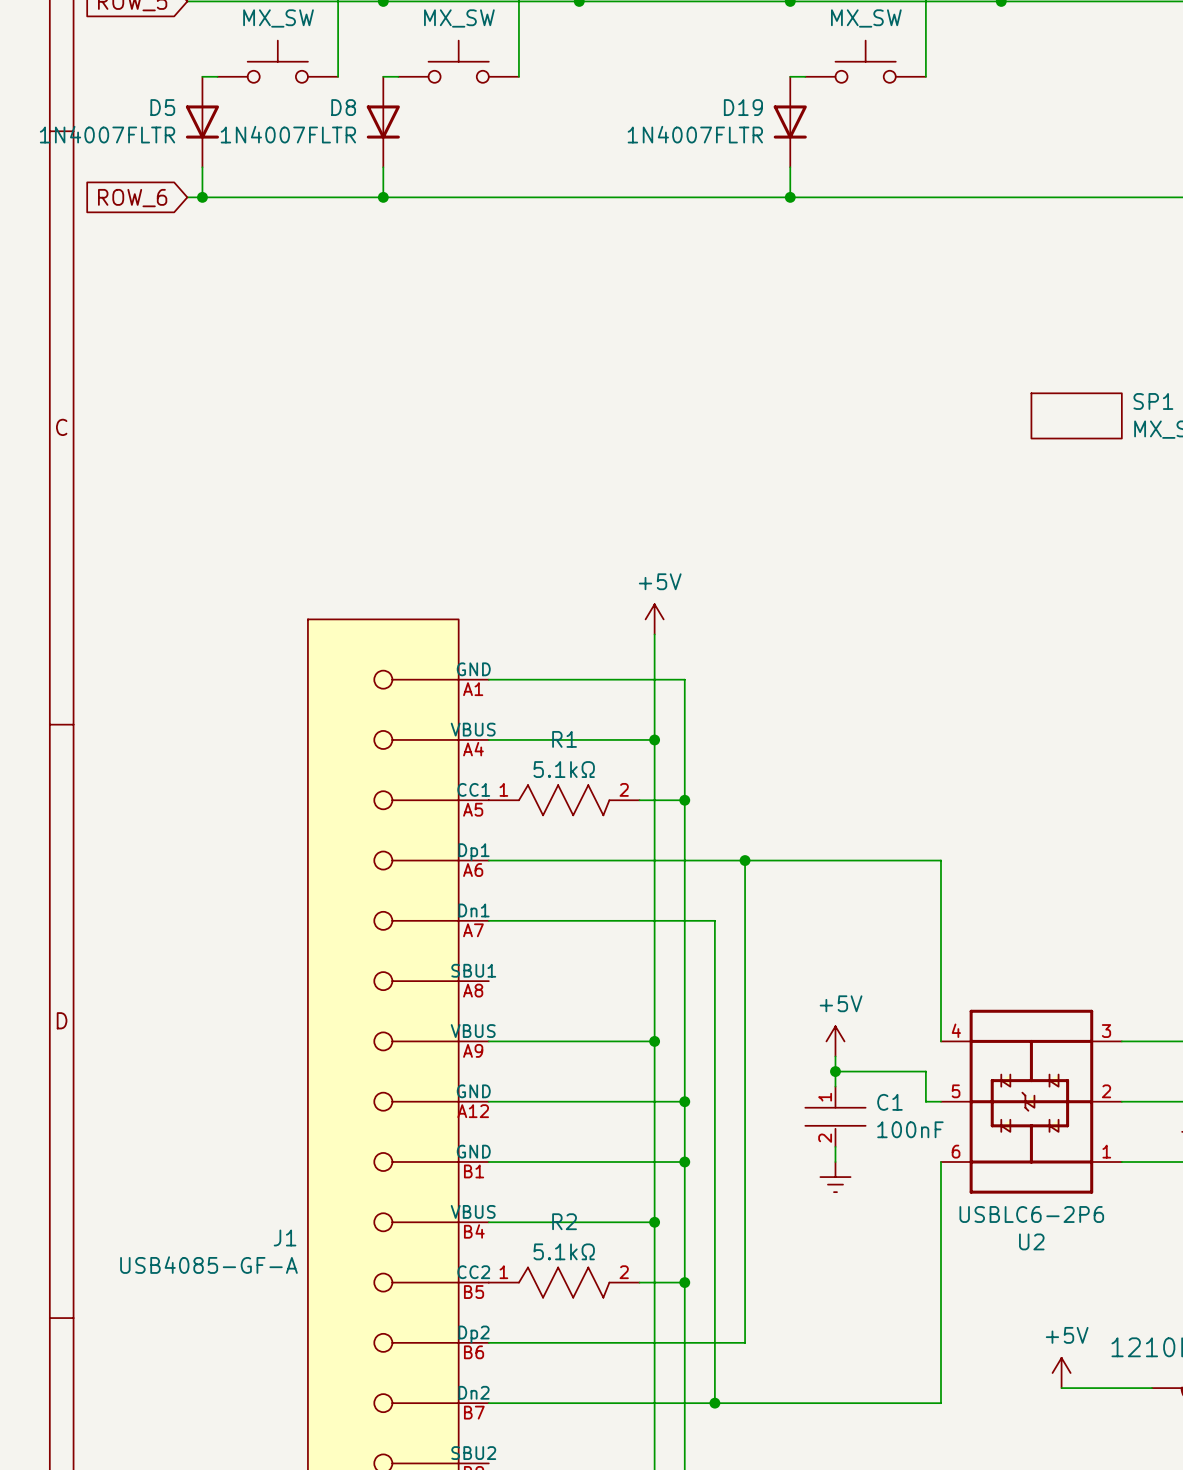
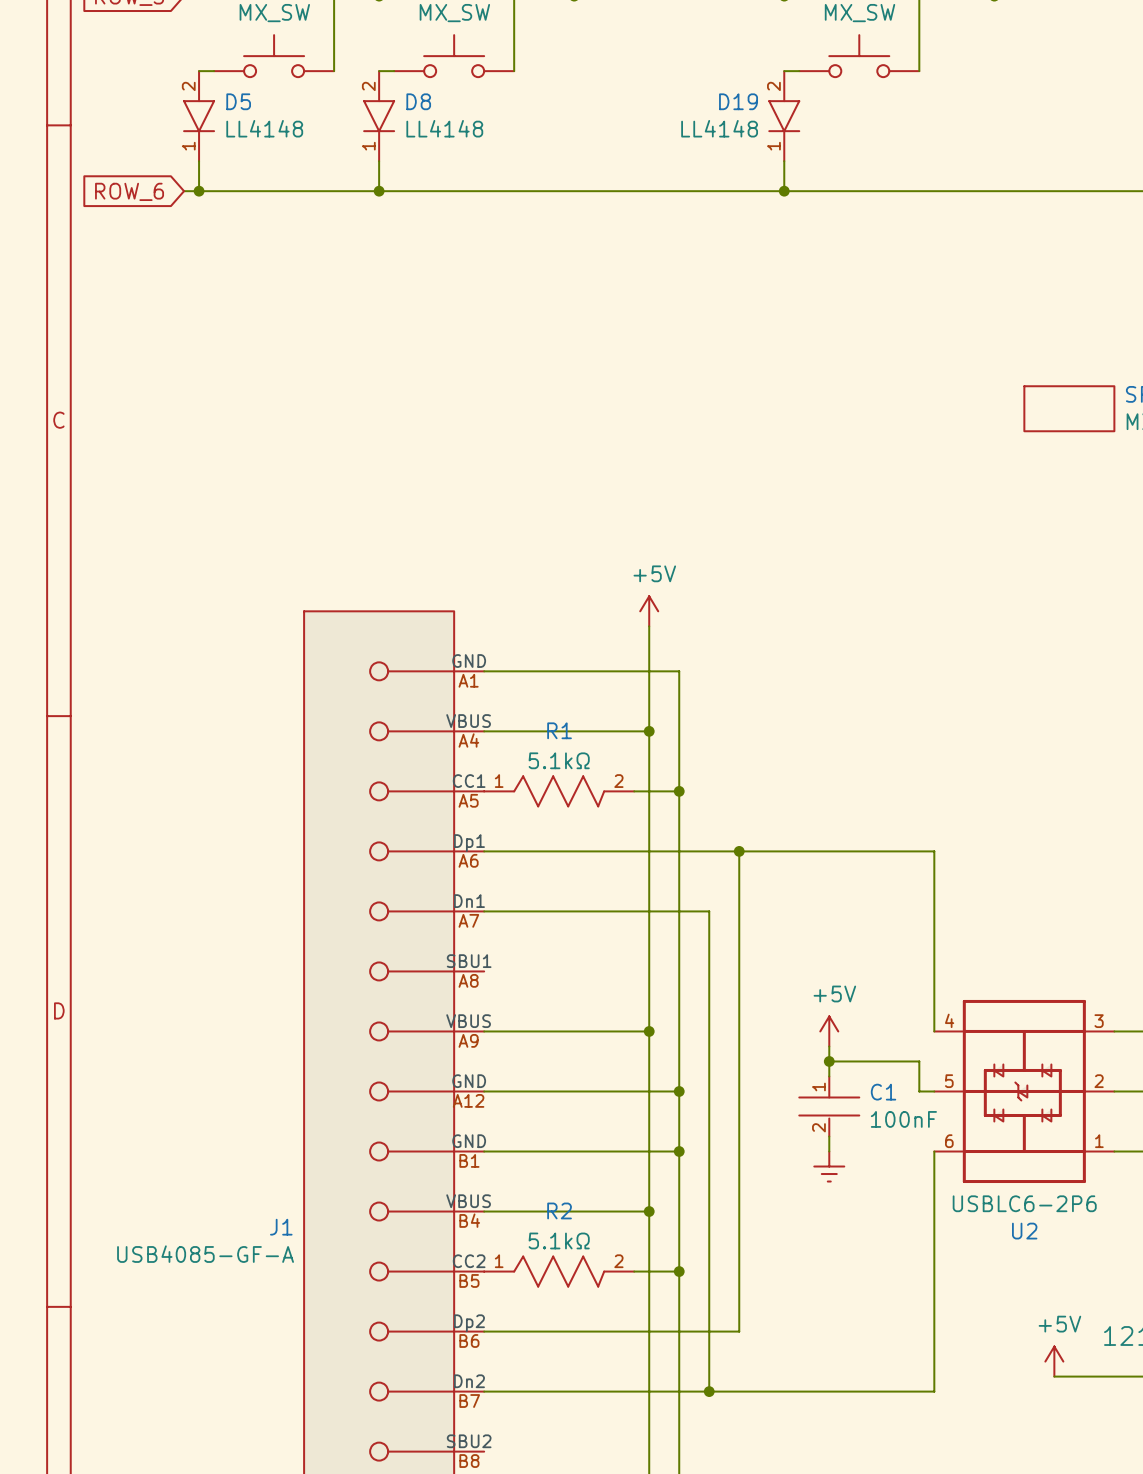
D5 symbol: [185, 76, 220, 168] -> [184, 71, 215, 162]
D8 symbol: [366, 76, 400, 168] -> [364, 71, 395, 162]
D19 symbol: [773, 76, 807, 168] -> [769, 71, 800, 162]
D5 name position: D5 (162, 107) -> D5 (238, 101)
D8 name position: D8 (343, 107) -> D8 (418, 101)
D5 value: 1N4007FLTR (107, 134) -> LL4148 (264, 128)
D8 value: 1N4007FLTR (288, 134) -> LL4148 (444, 128)
D19 value: 1N4007FLTR (695, 134) -> LL4148 (719, 128)

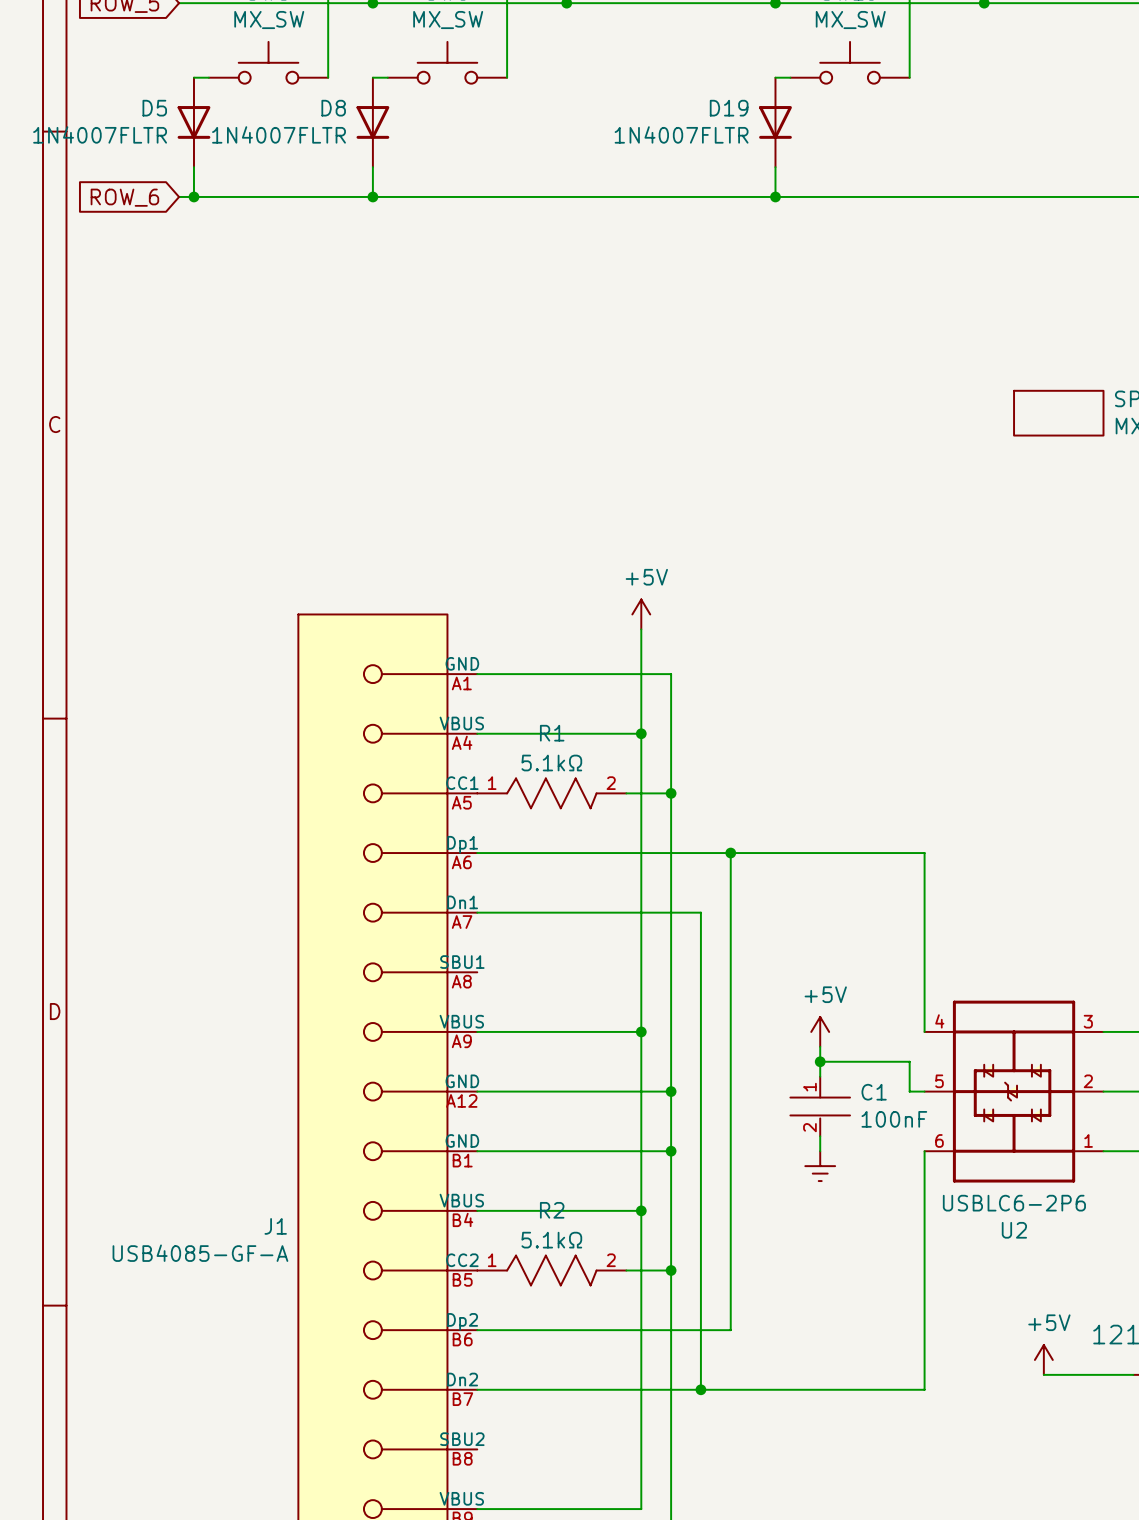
D5 symbol: [184, 71, 215, 162] -> [177, 77, 211, 168]
D8 symbol: [364, 71, 395, 162] -> [356, 77, 390, 168]
D19 symbol: [769, 71, 800, 162] -> [759, 77, 792, 168]
D5 name position: D5 (238, 101) -> D5 (154, 108)
D8 name position: D8 (418, 101) -> D8 (333, 108)
D5 value: LL4148 (264, 128) -> 1N4007FLTR (100, 134)
D8 value: LL4148 (444, 128) -> 1N4007FLTR (279, 134)
D19 value: LL4148 (719, 128) -> 1N4007FLTR (681, 134)

